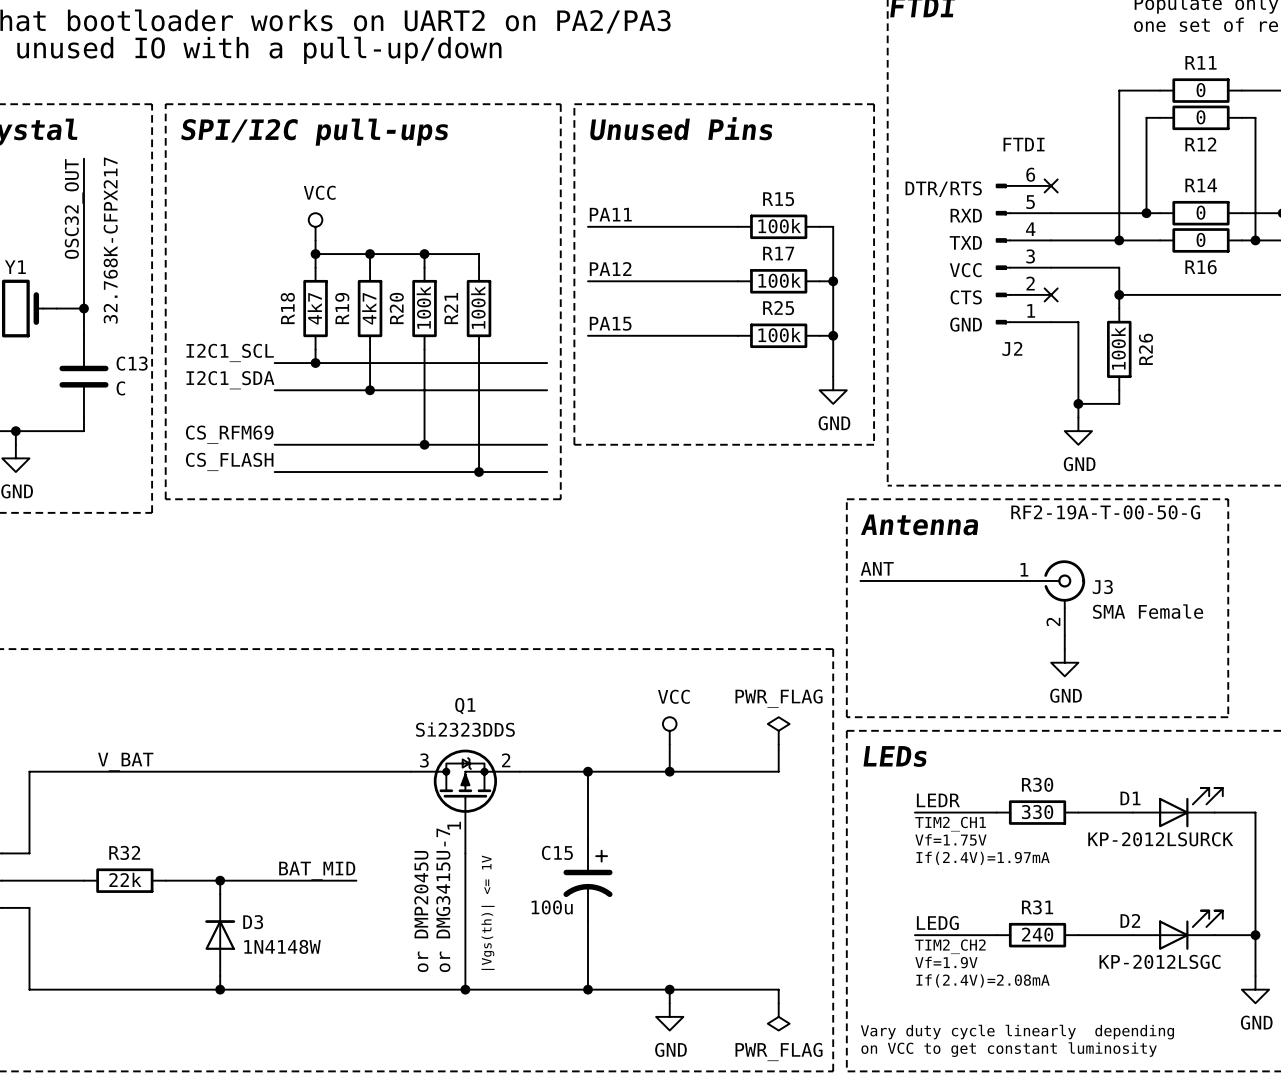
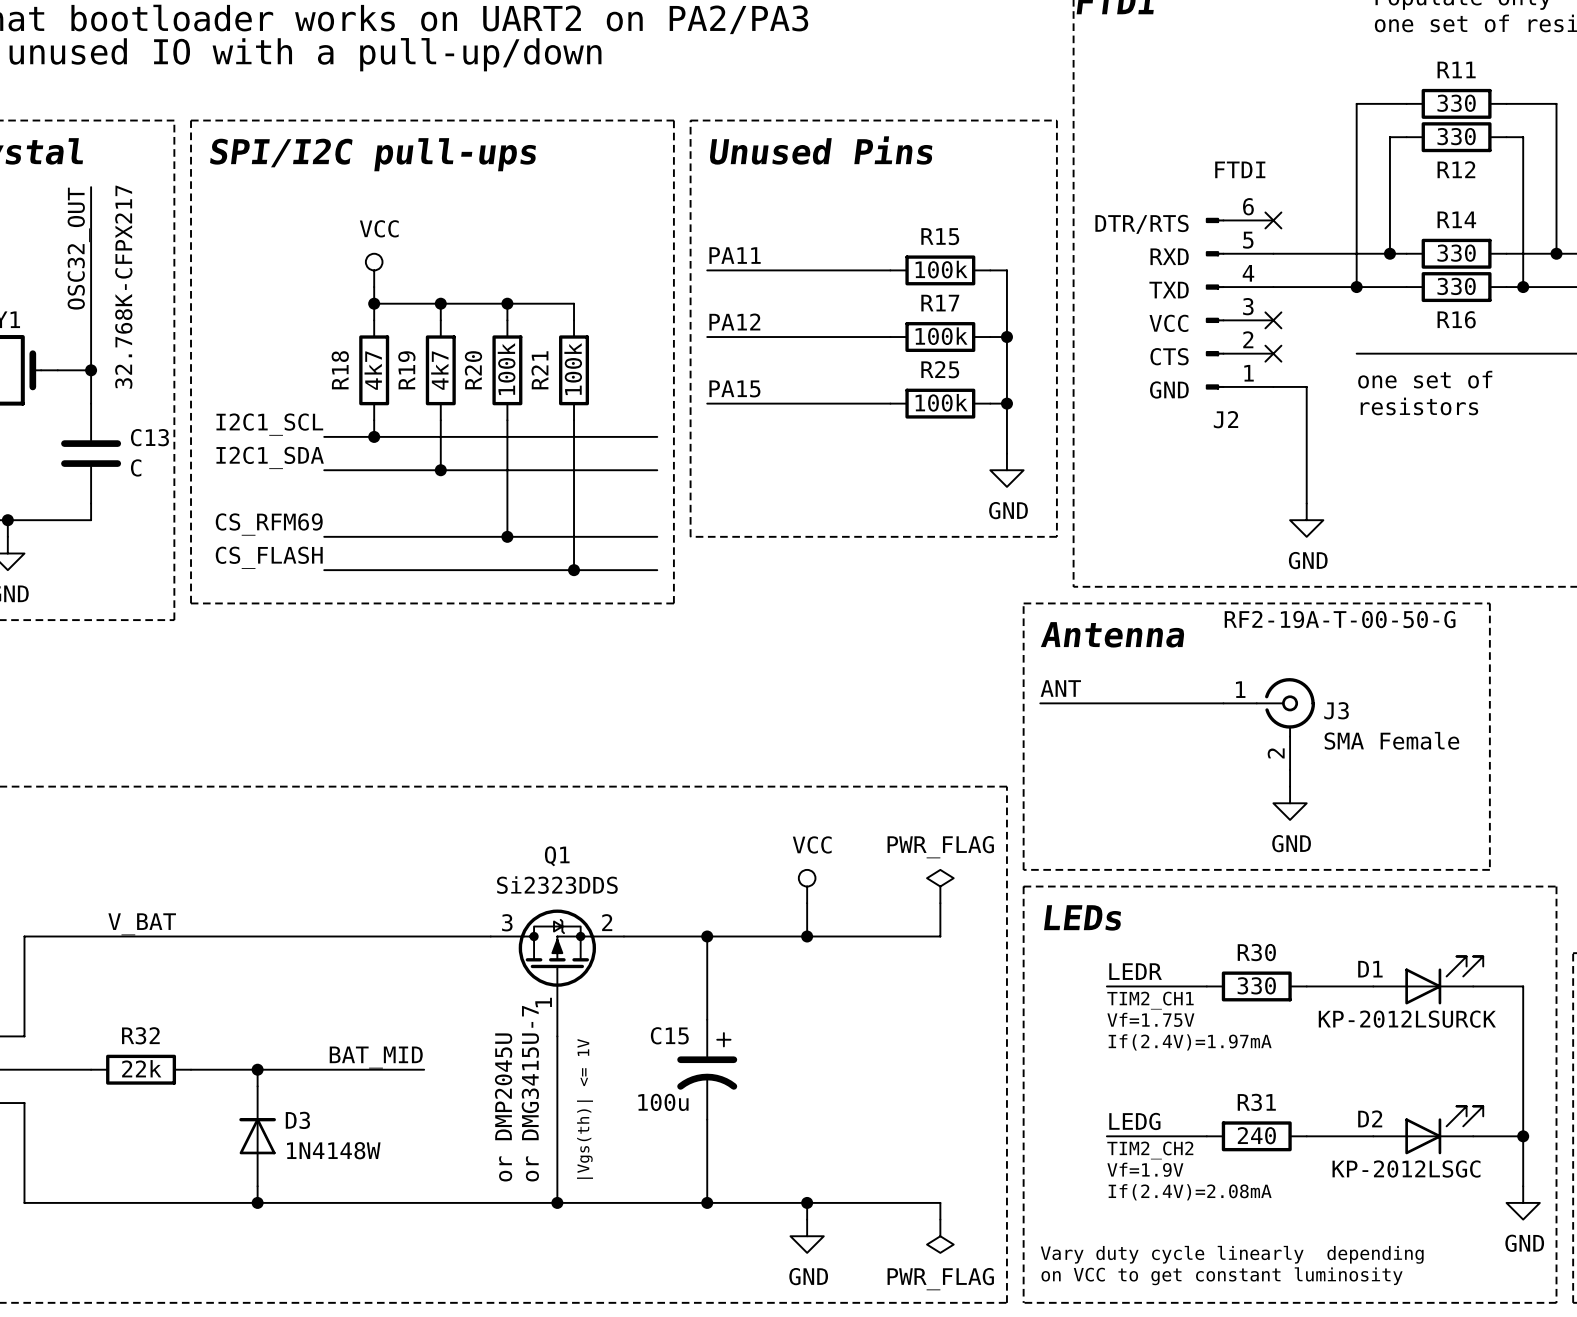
R11 value: 0 (1201, 90) -> 330 (1456, 103)
R12 value: 0 (1201, 117) -> 330 (1456, 136)
R14 value: 0 (1201, 212) -> 330 (1456, 253)
R16 value: 0 (1201, 239) -> 330 (1456, 286)
wire: (1051, 267) (1119, 267) (1119, 308) -> none
no-connect mark: none -> (1273, 320)
junction: (1119, 294) -> none
text: none -> one set of (1425, 379)
text: none -> resistors (1419, 406)
R26: 100k (1119, 349) -> none
wire: (1119, 390) (1119, 403) (1078, 403) -> none
junction: (1078, 403) -> none

